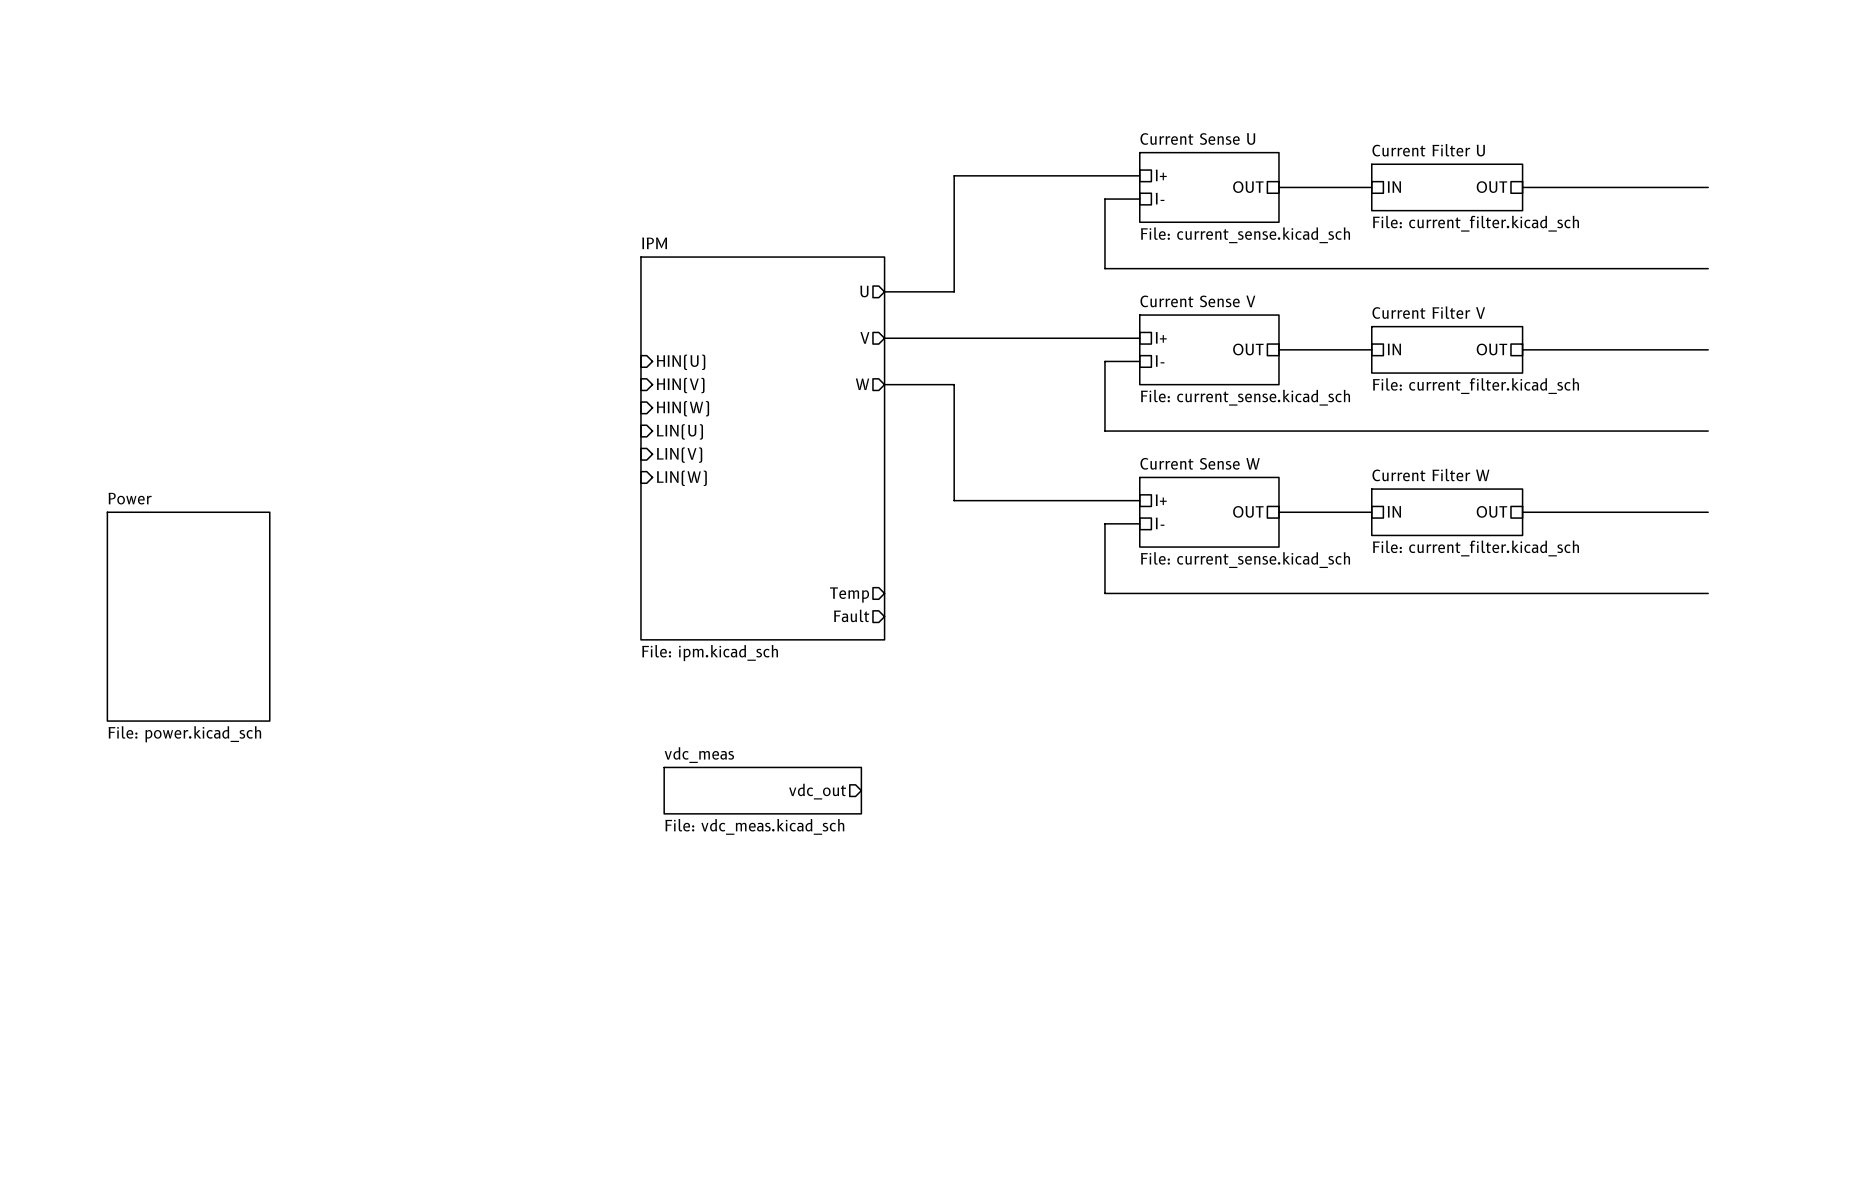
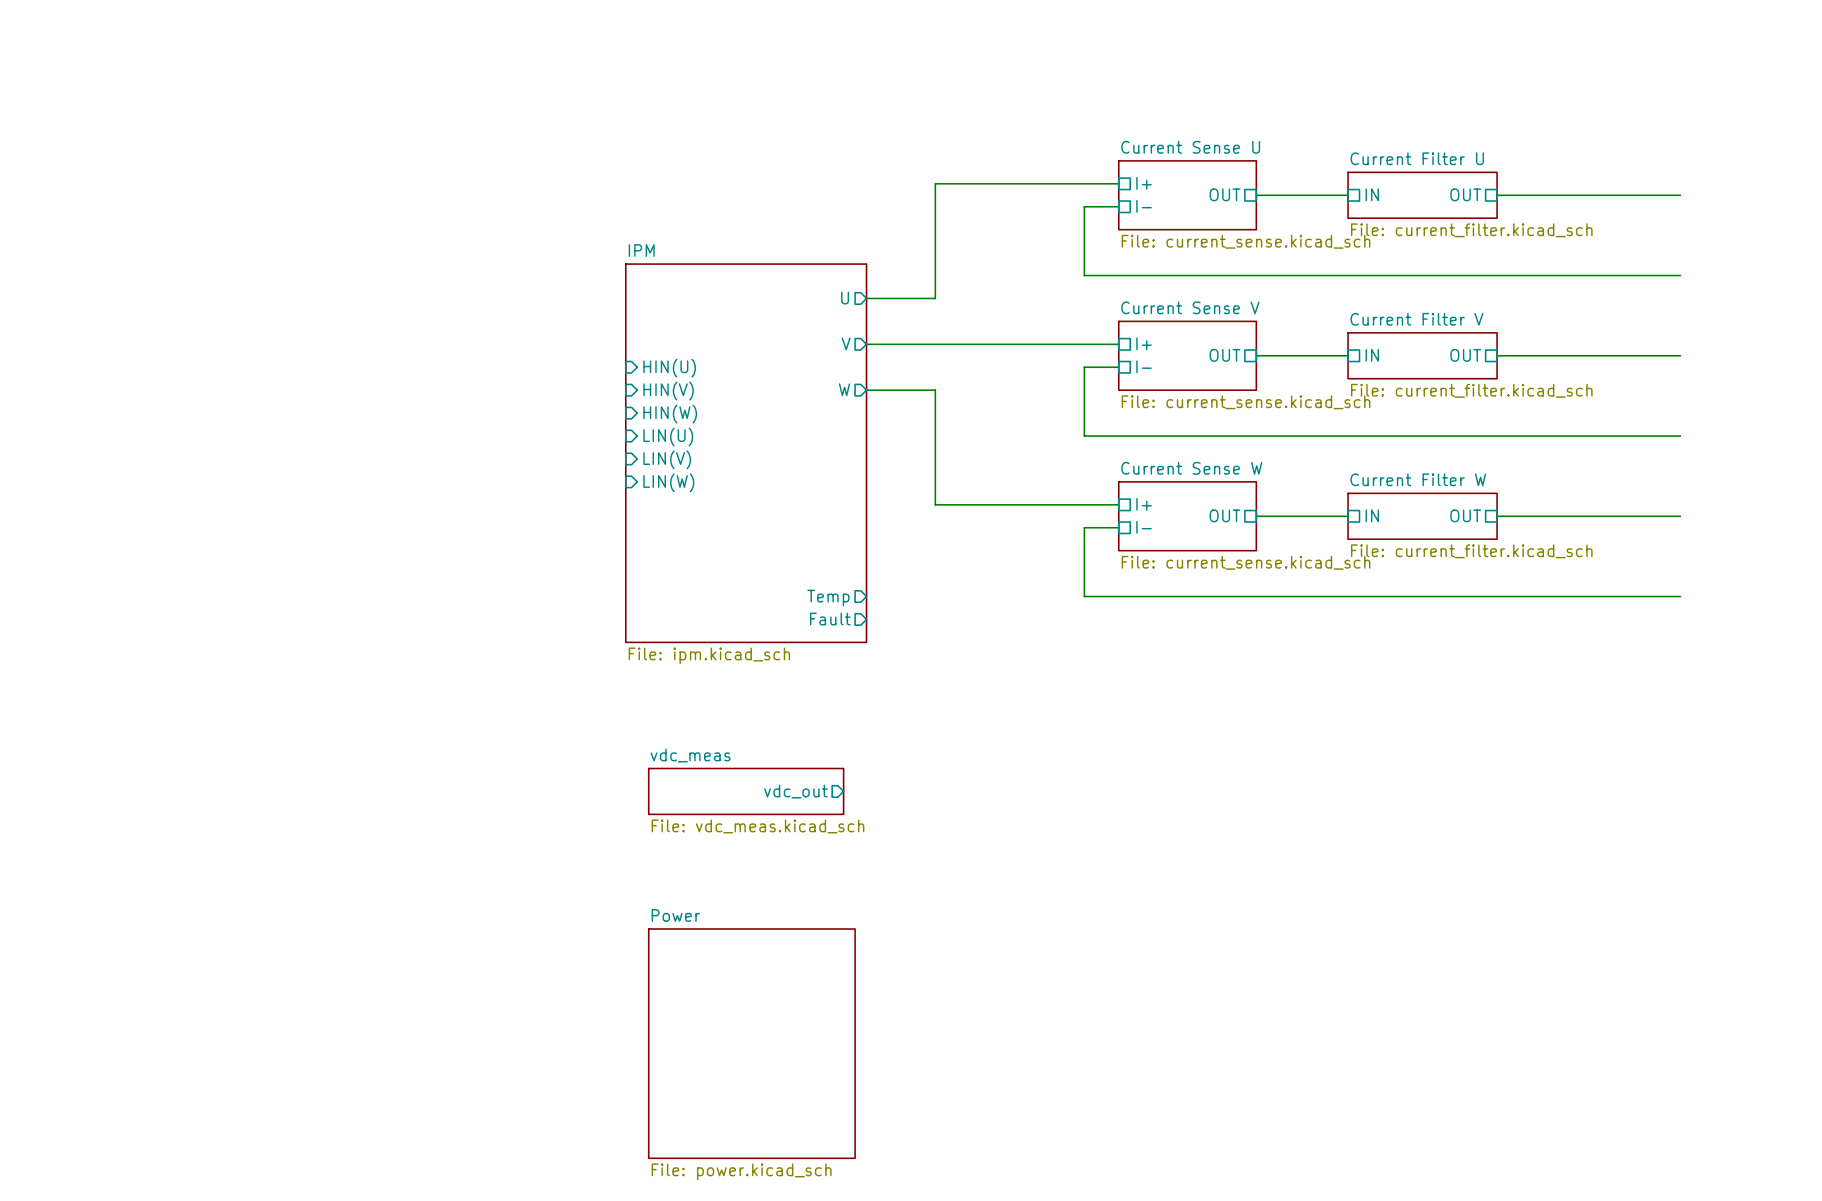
sheet Power: File: power.kicad_sch (188, 616) -> none
sheet Power: none -> File: power.kicad_sch (751, 1043)

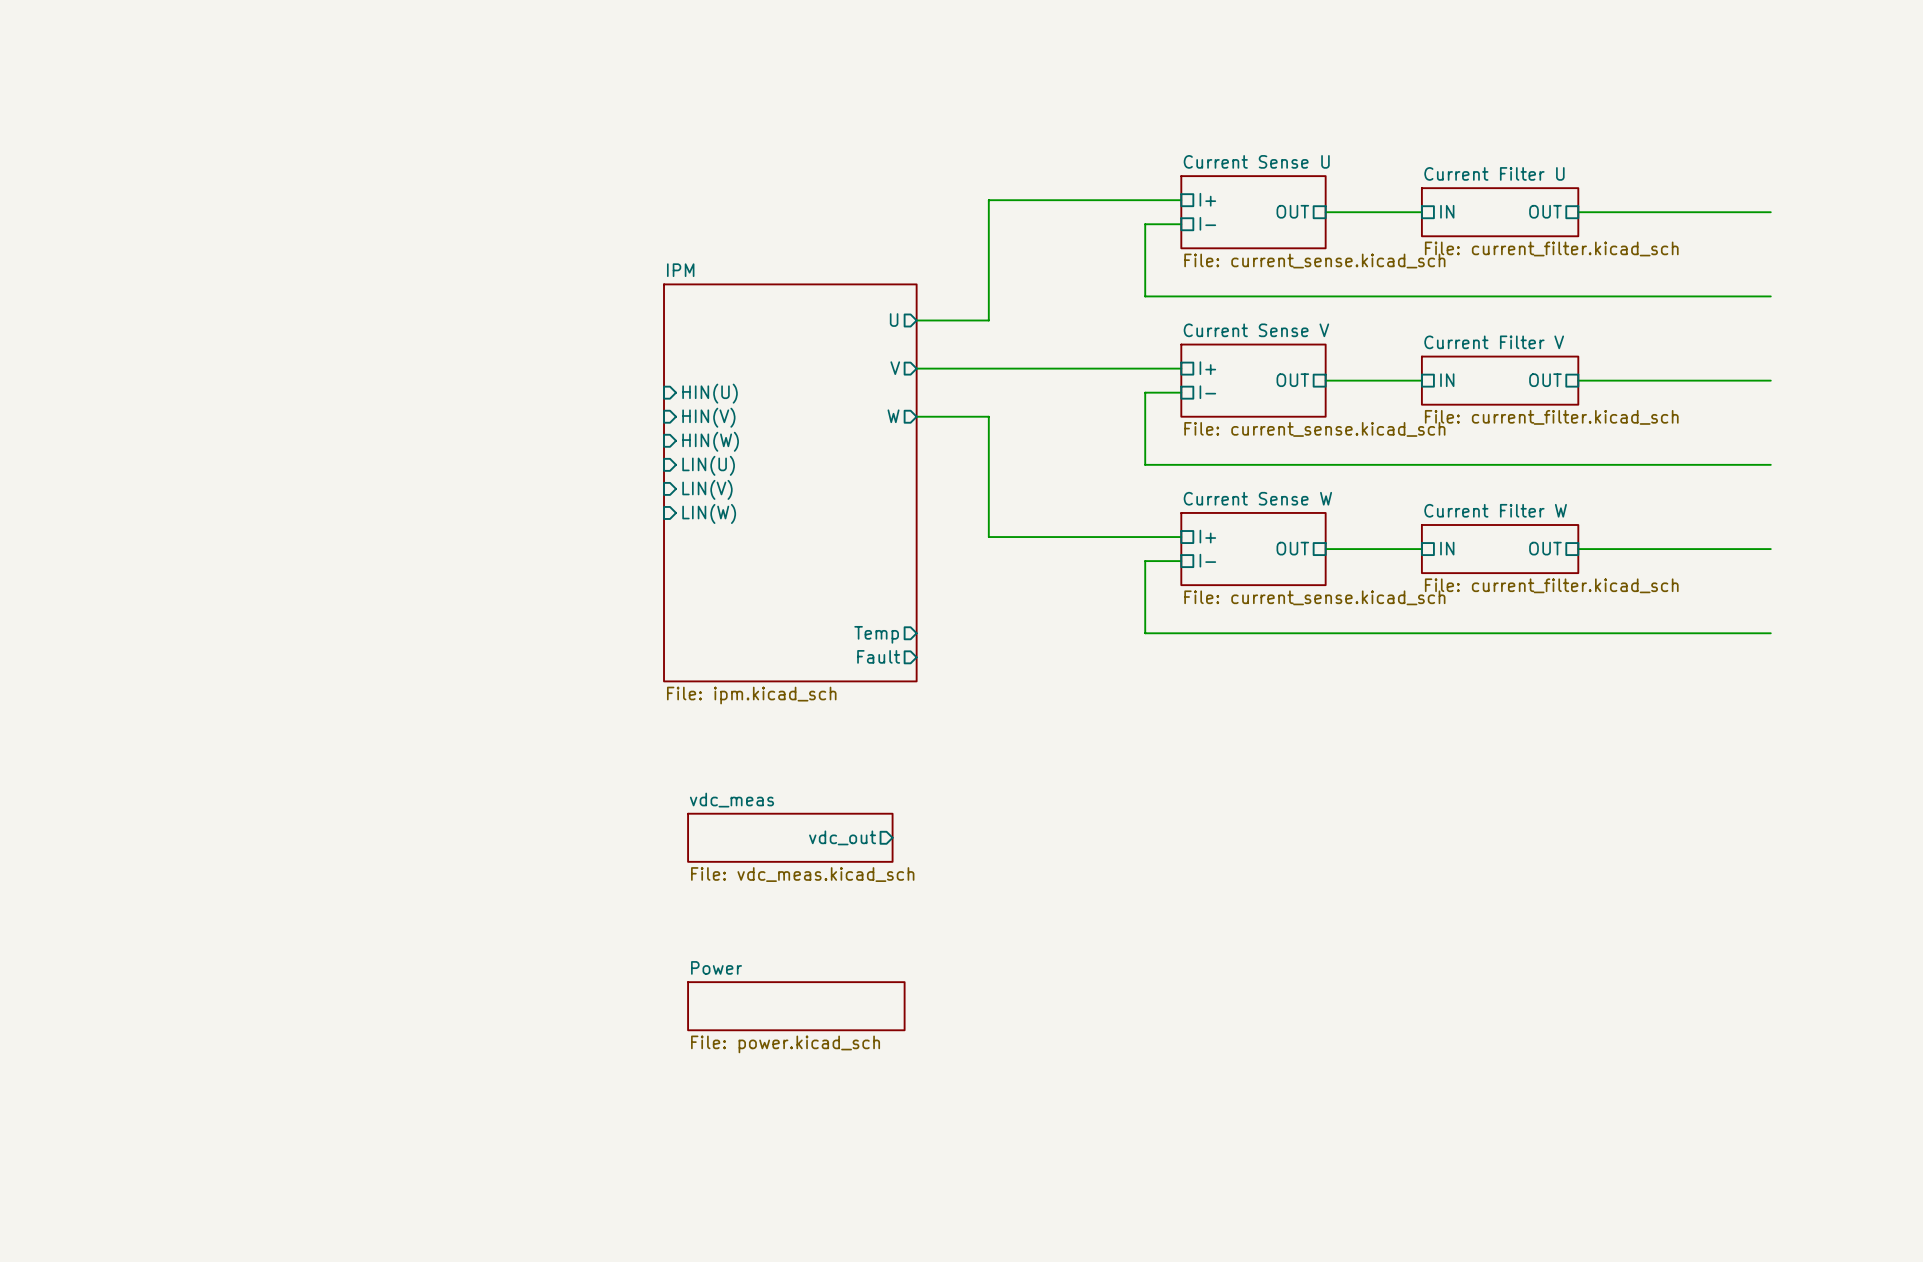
sheet Power: none -> File: power.kicad_sch (796, 1006)
sheet Power: File: power.kicad_sch (751, 1043) -> none

